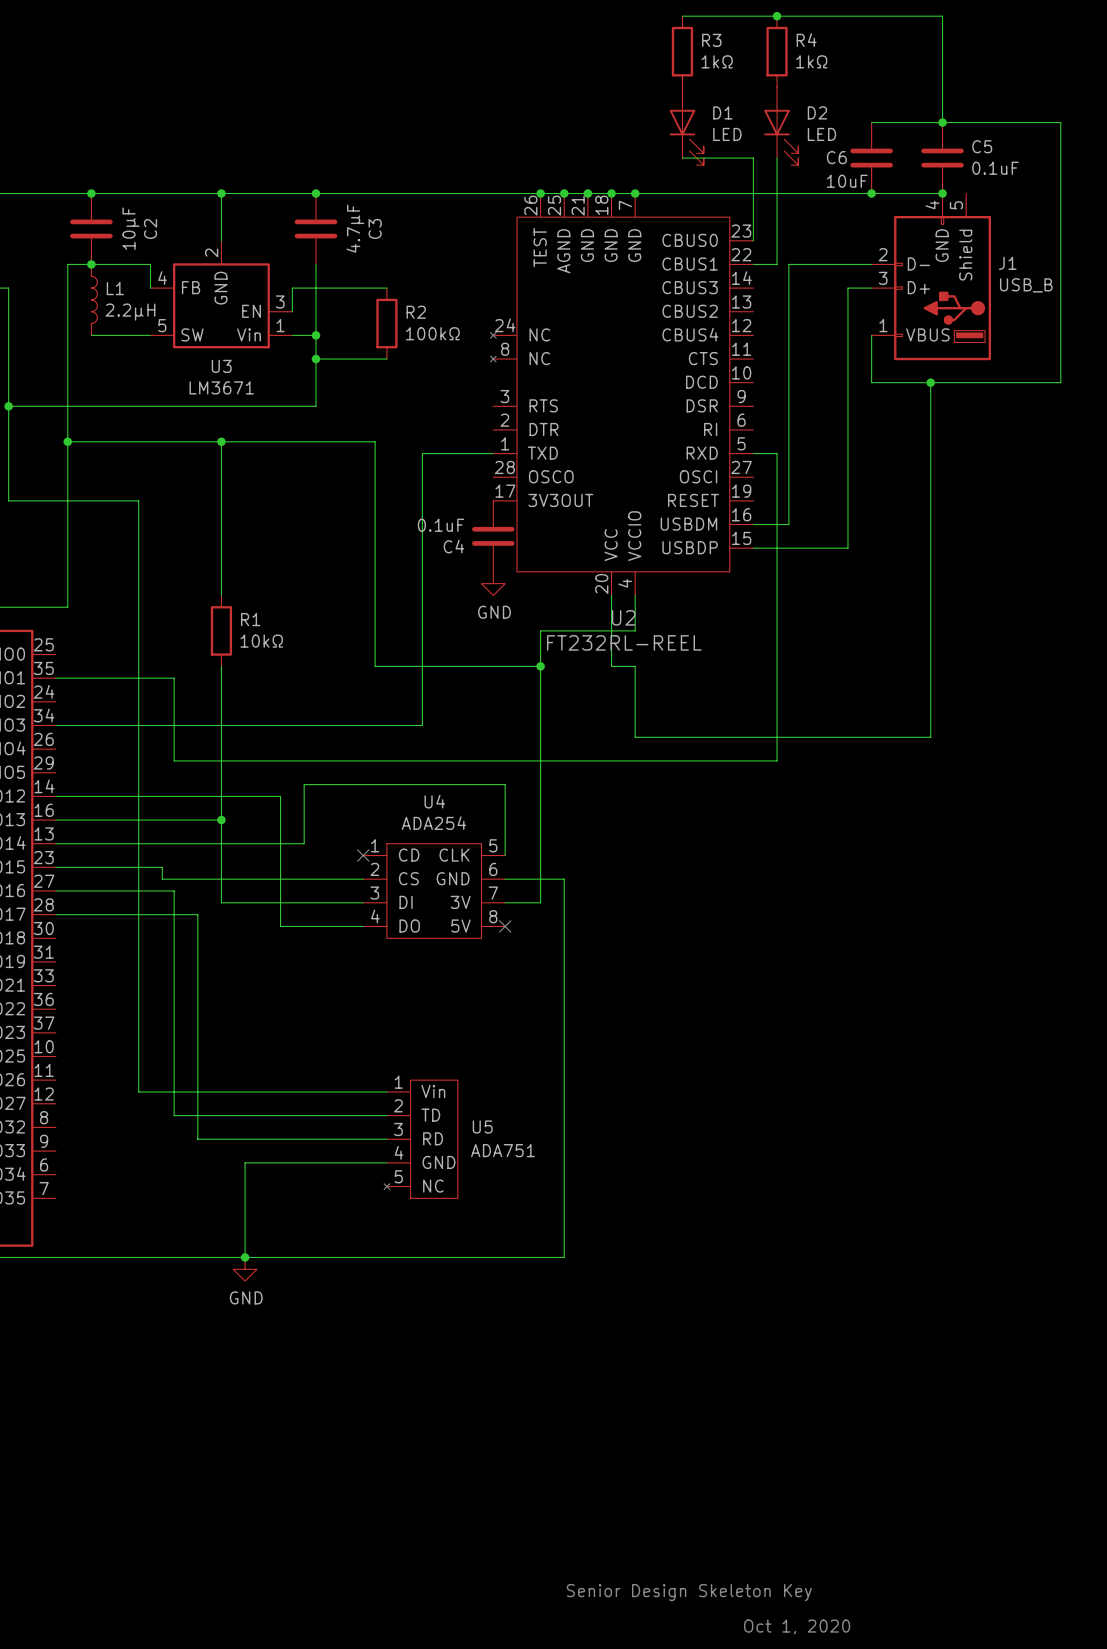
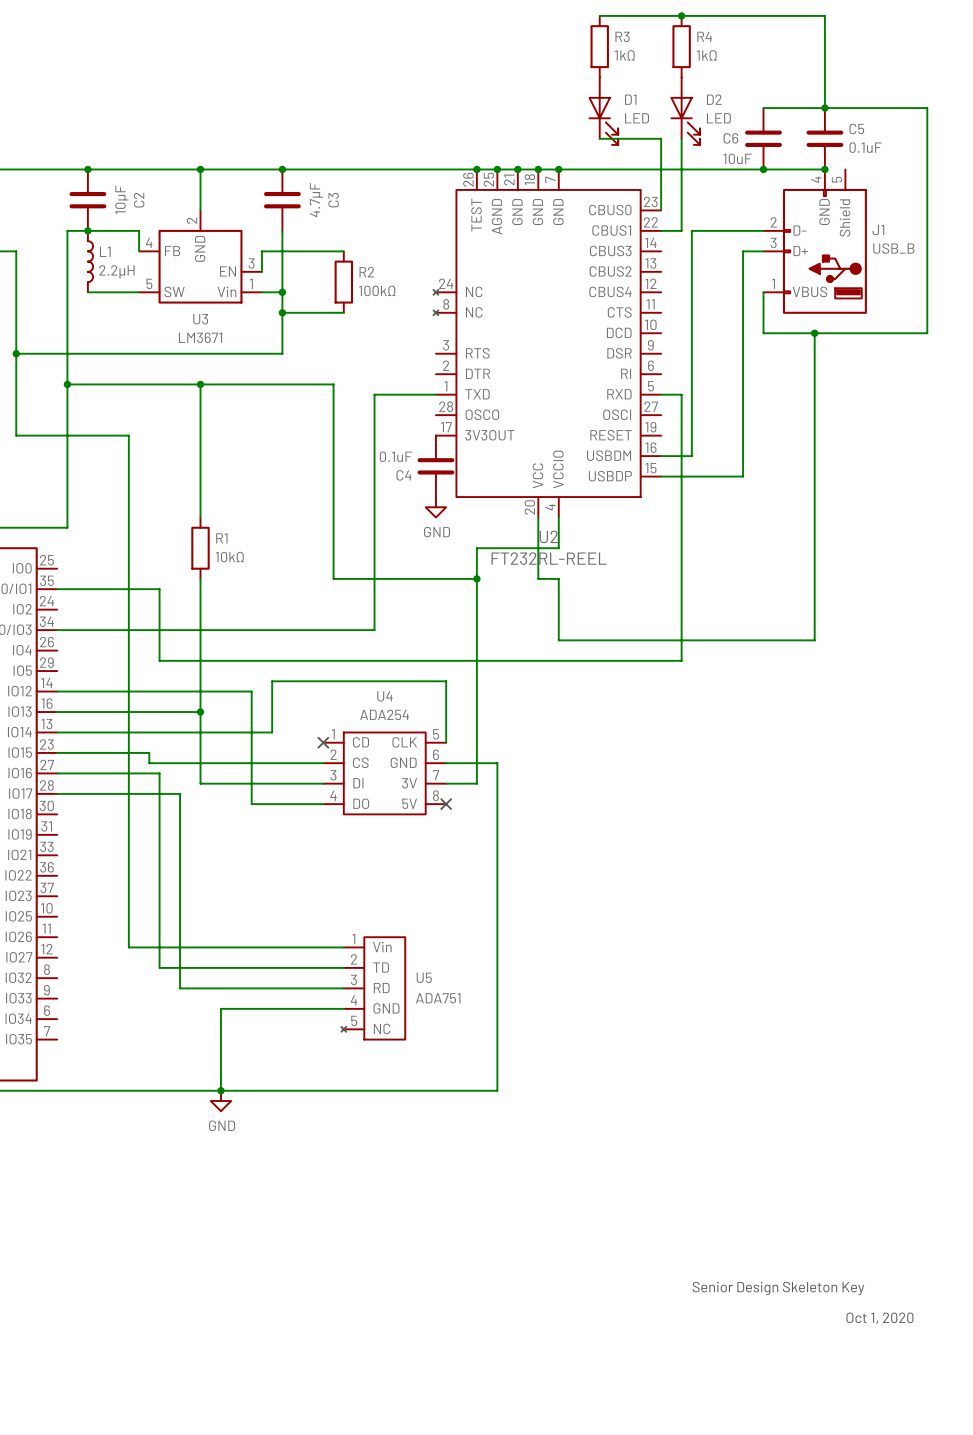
text: none -> Senior Design Skeleton Key (778, 1288)
text: none -> Oct 1, 2020 (879, 1318)
text: Senior Design Skeleton Key (689, 1592) -> none
text: Oct 1, 2020 (797, 1626) -> none

